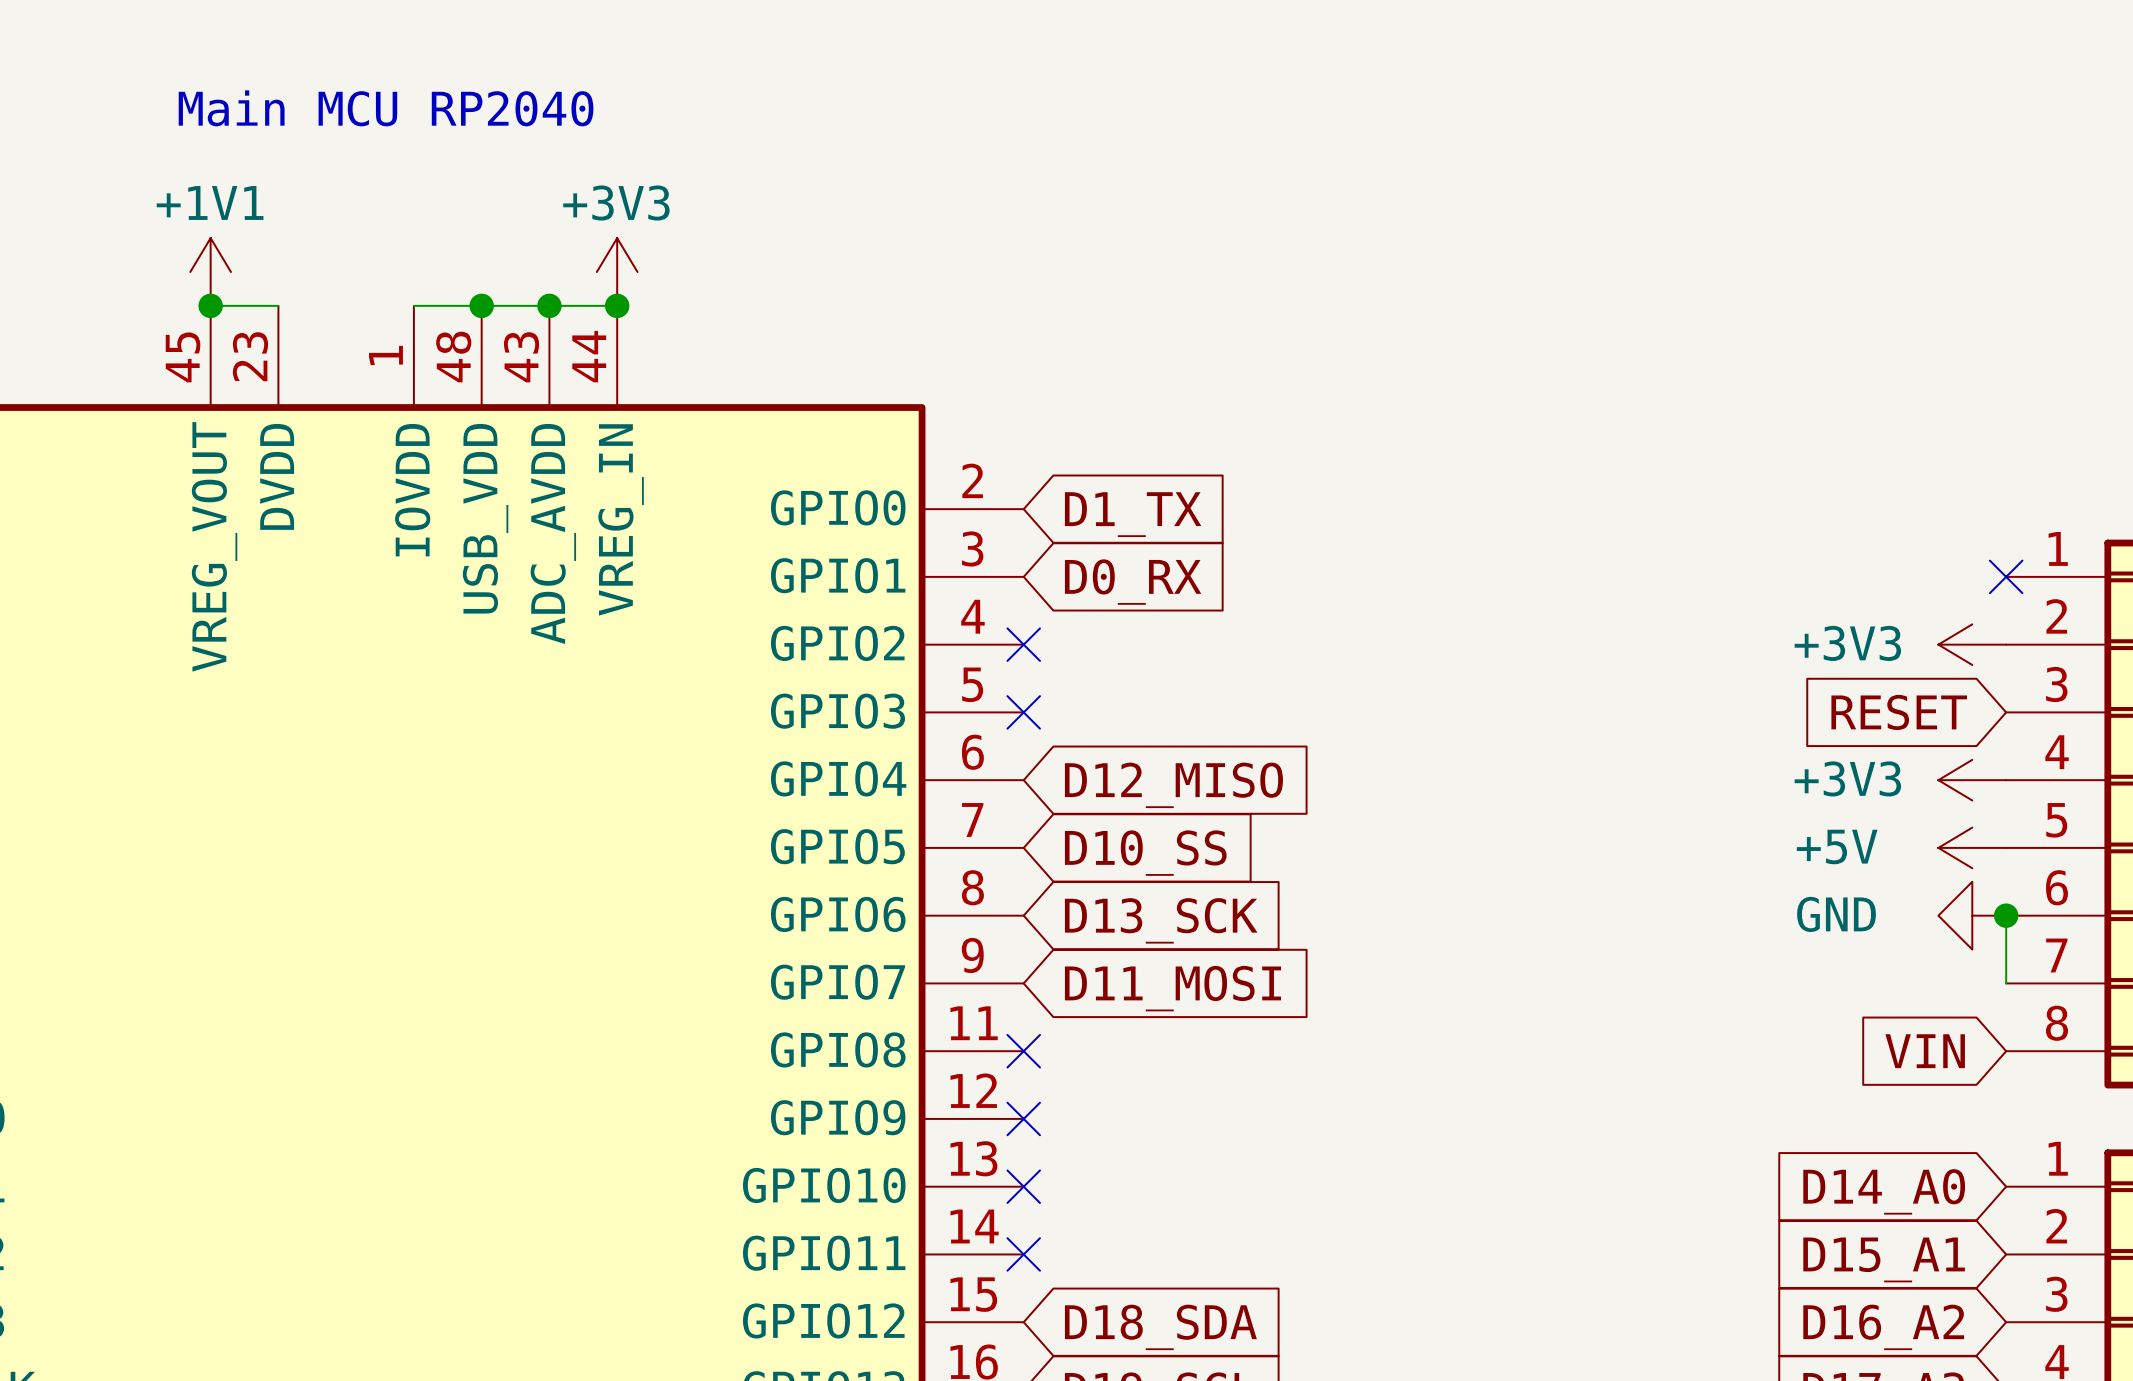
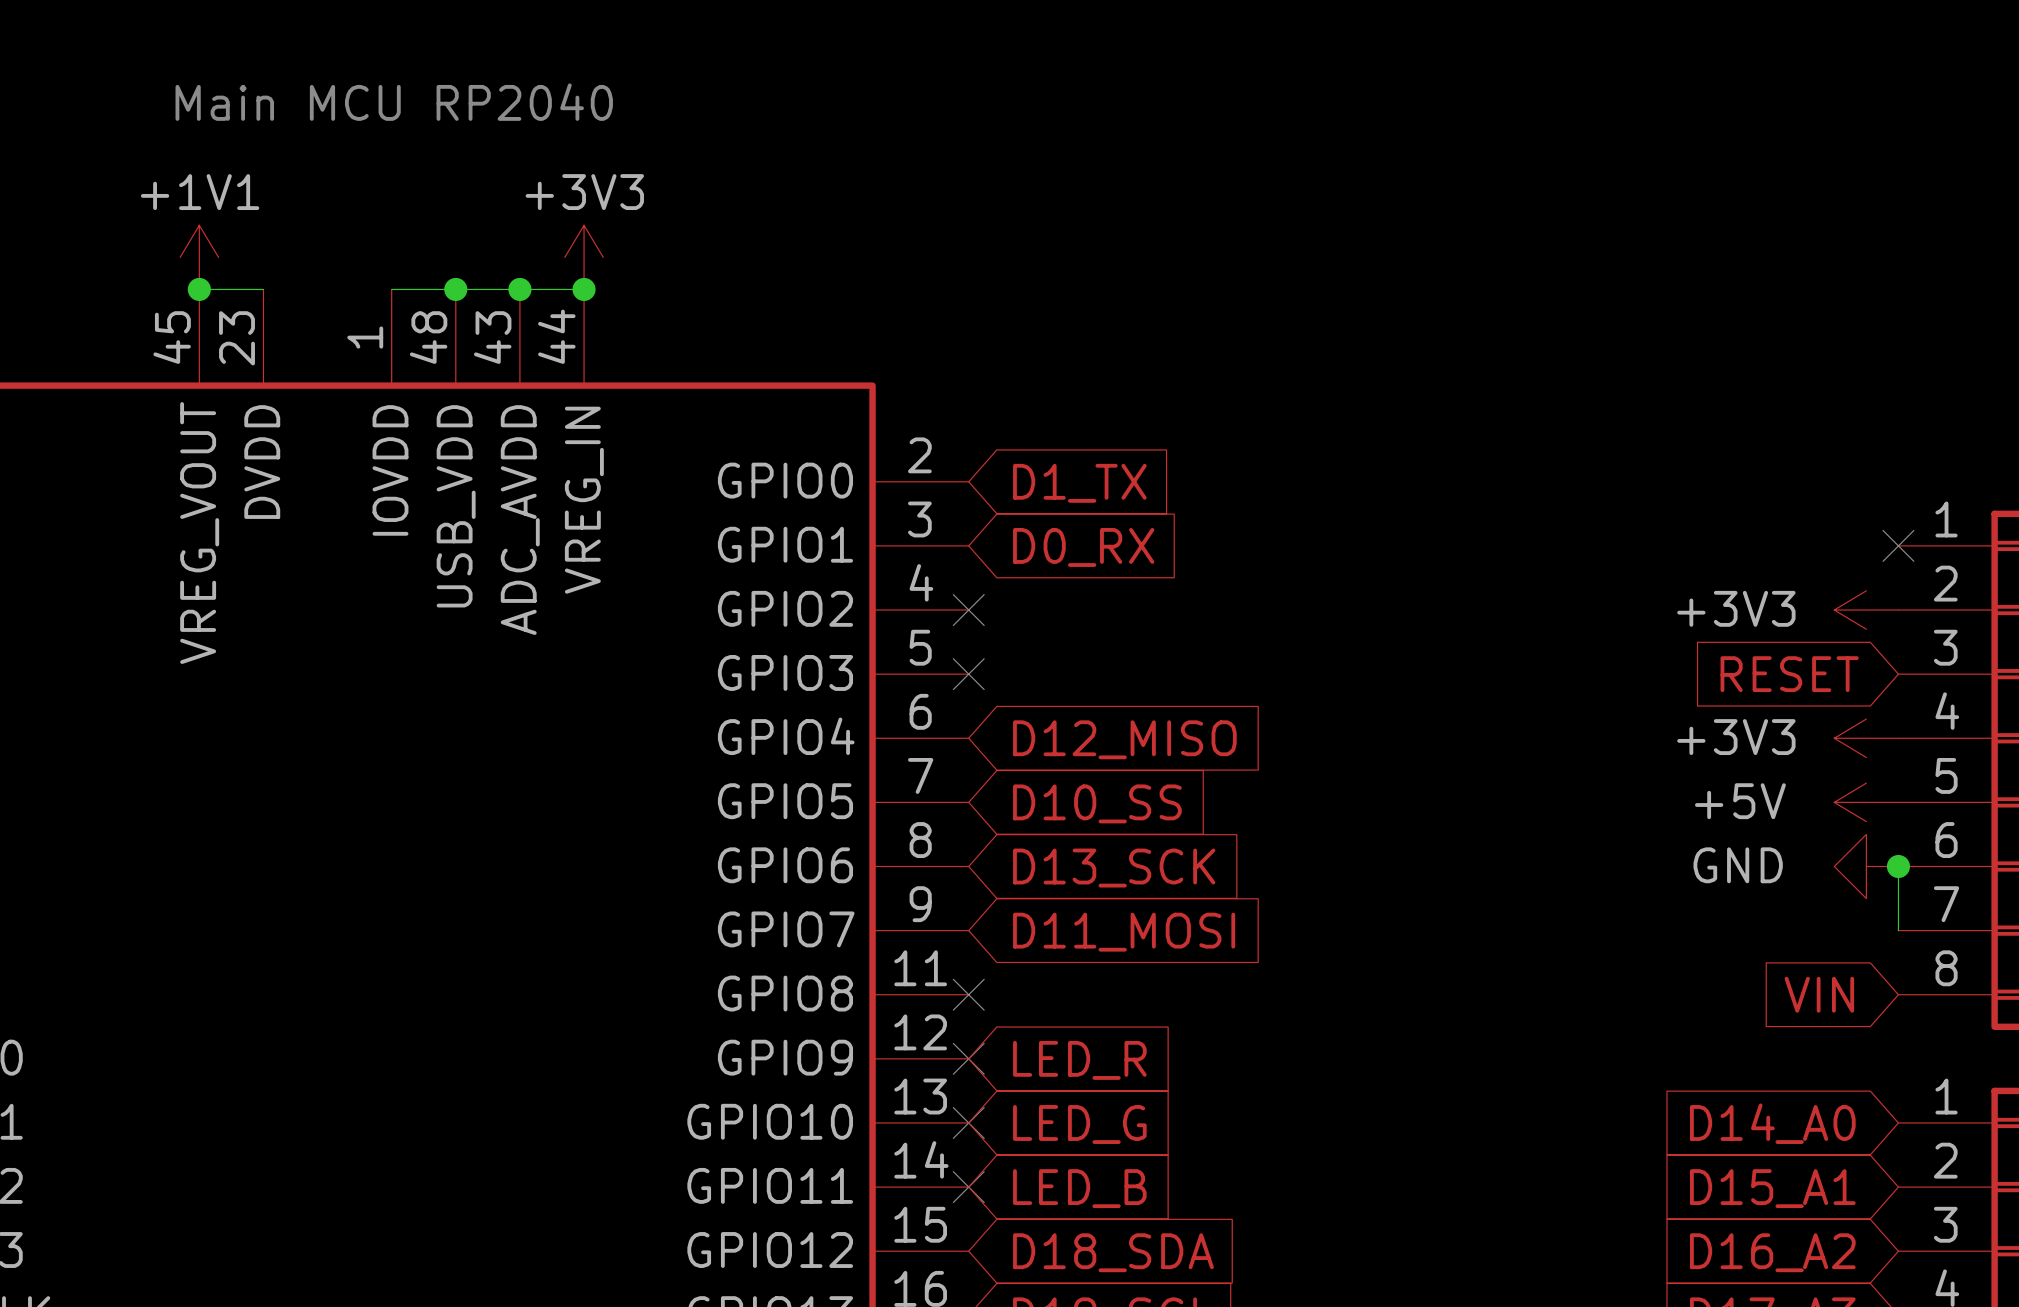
global label: none -> LED_R (1079, 1060)
global label: none -> LED_G (1079, 1124)
global label: none -> LED_B (1079, 1188)

